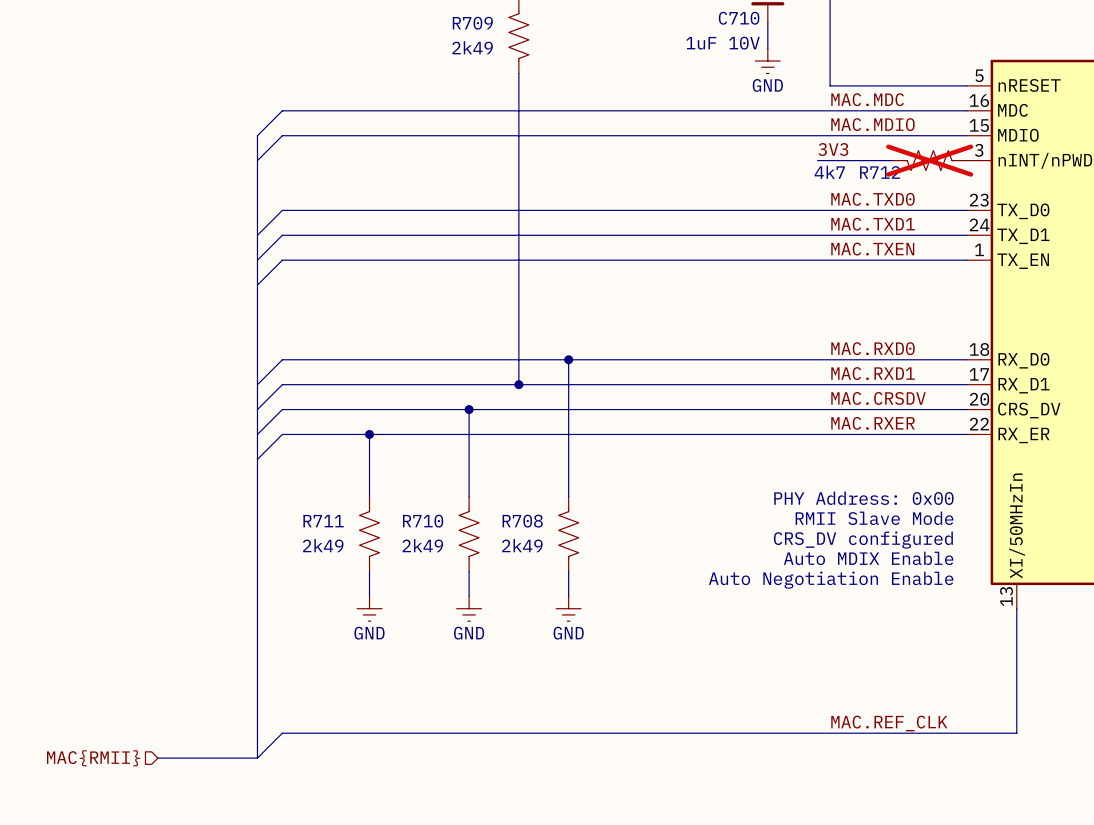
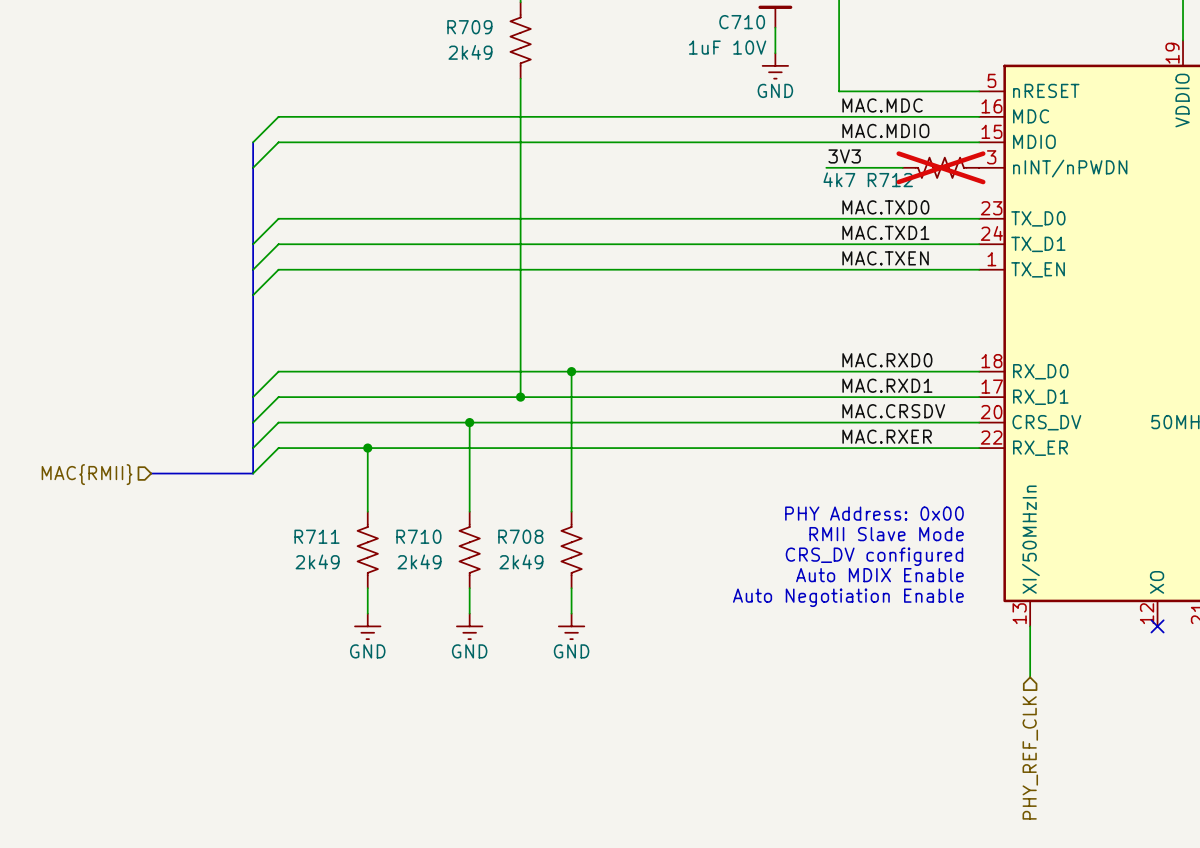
hierarchical label: none -> MAC{RMII} (87, 474)
bus: (257, 459) (257, 758) (157, 758) -> (253, 473) (151, 473)
wire: (1016, 658) (1016, 733) (282, 733) (257, 758) -> none
label: MAC.REF_CLK (889, 723) -> none
hierarchical label: none -> PHY_REF_CLK (1030, 757)
hierarchical label: MAC{RMII} (93, 758) -> none

